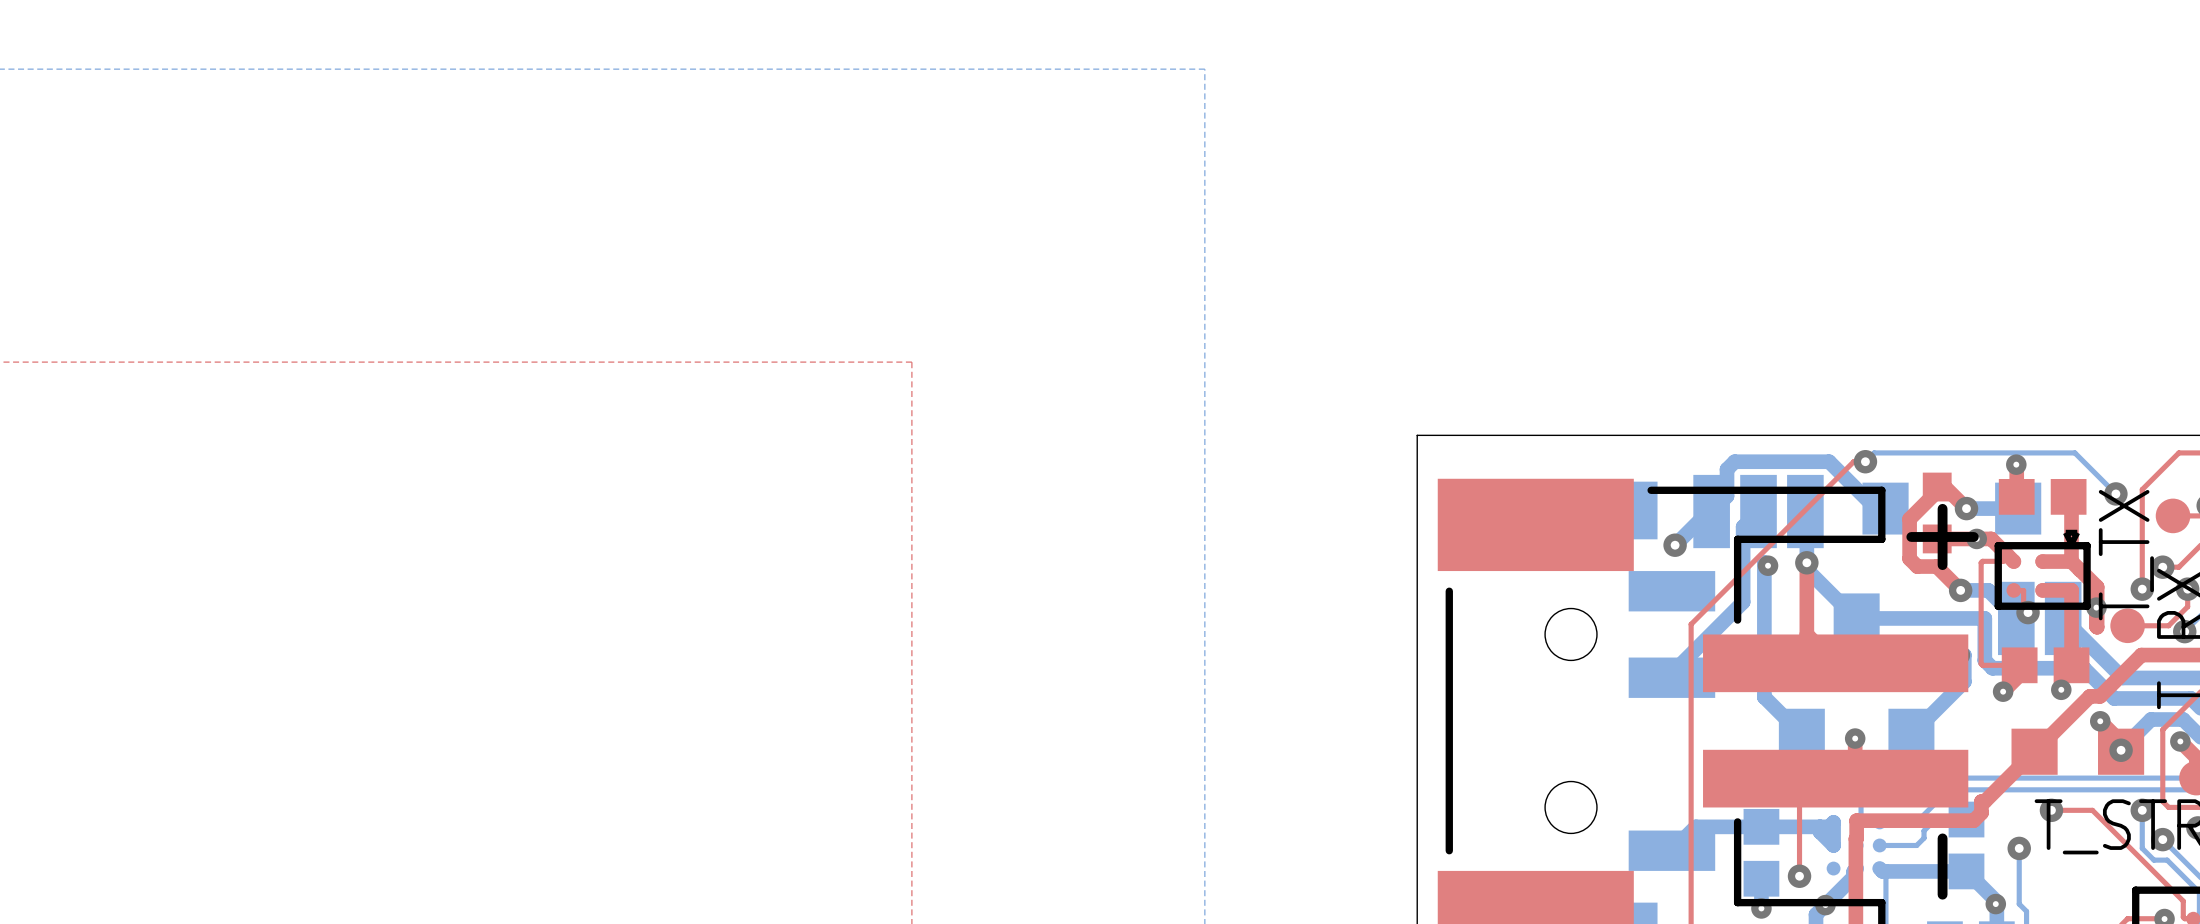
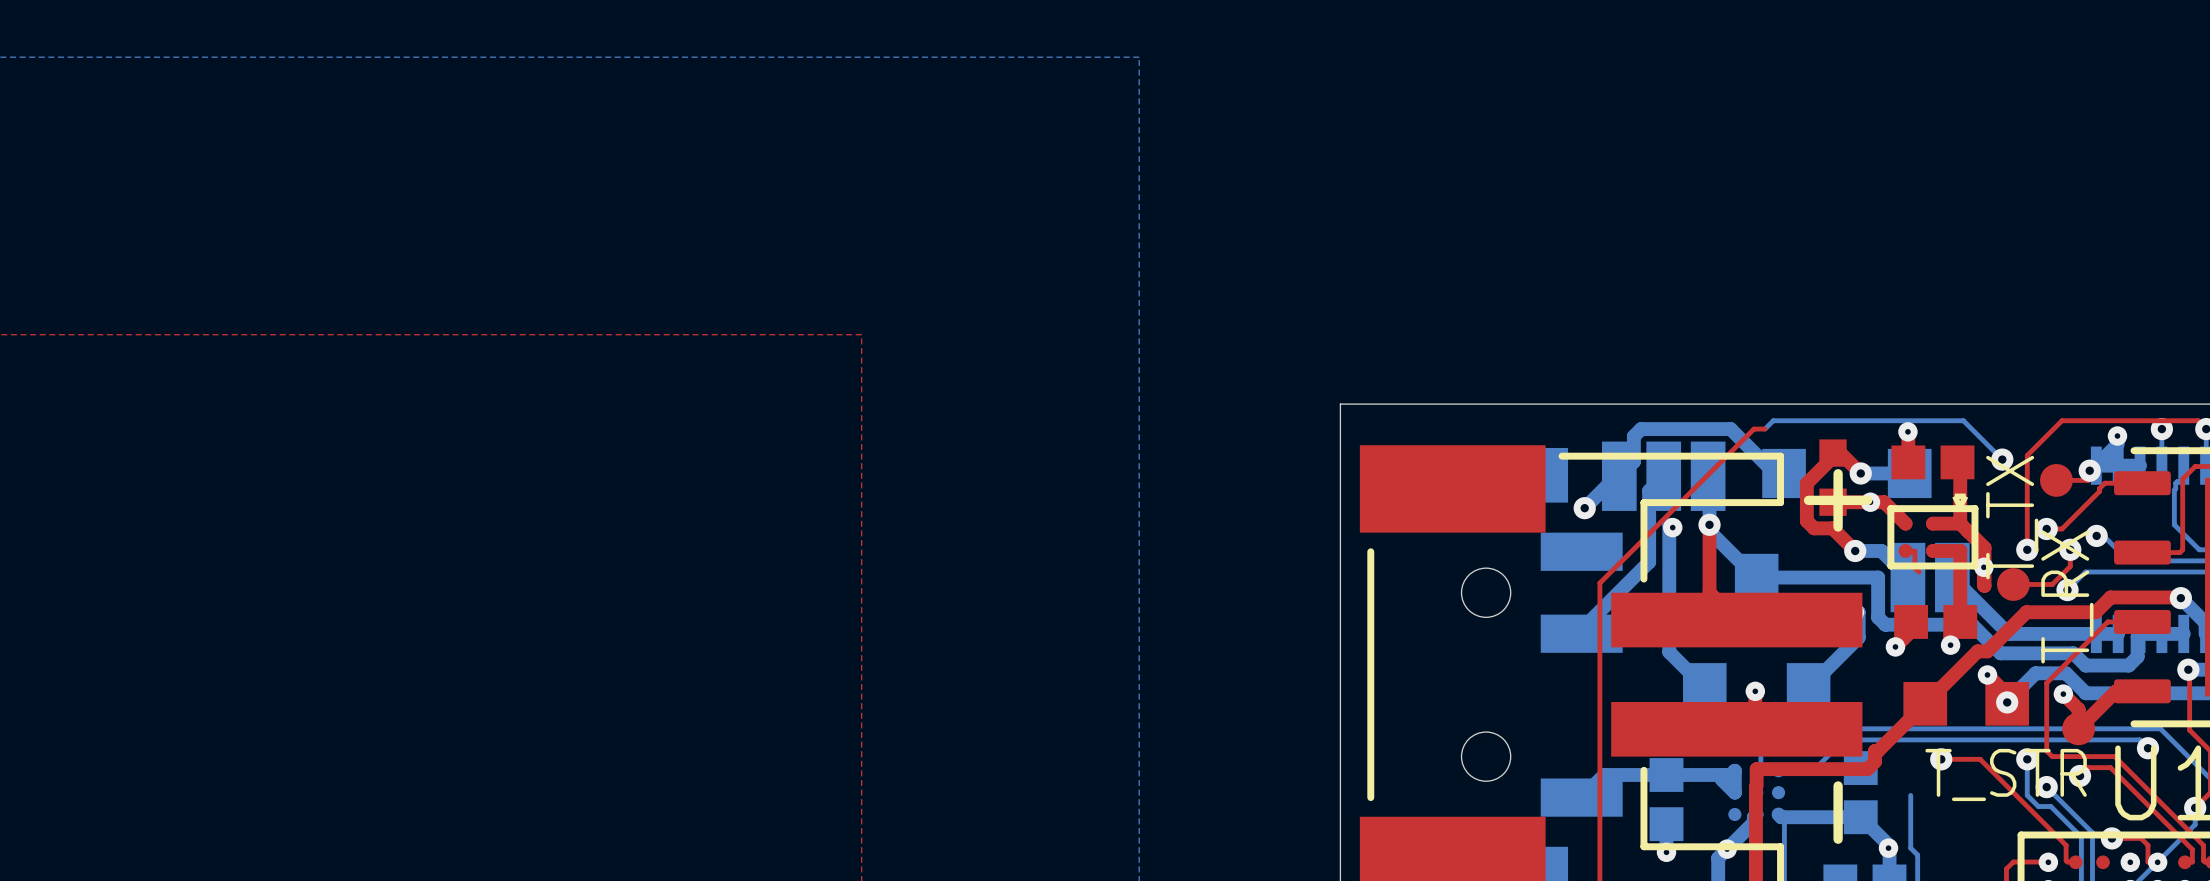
via: (1865, 461) -> none
top track: (2007, 555) (2003, 561) (1981, 562) (1981, 663) (2019, 665) -> none
via: (2028, 612) -> none
top track: (1835, 778) (1799, 779) (1799, 876) -> none
bottom track: (1966, 819) (1935, 819) (1924, 830) (1924, 838) (1916, 845) (1879, 845) -> none
via: (2019, 848) -> none
via: (1799, 876) -> none

